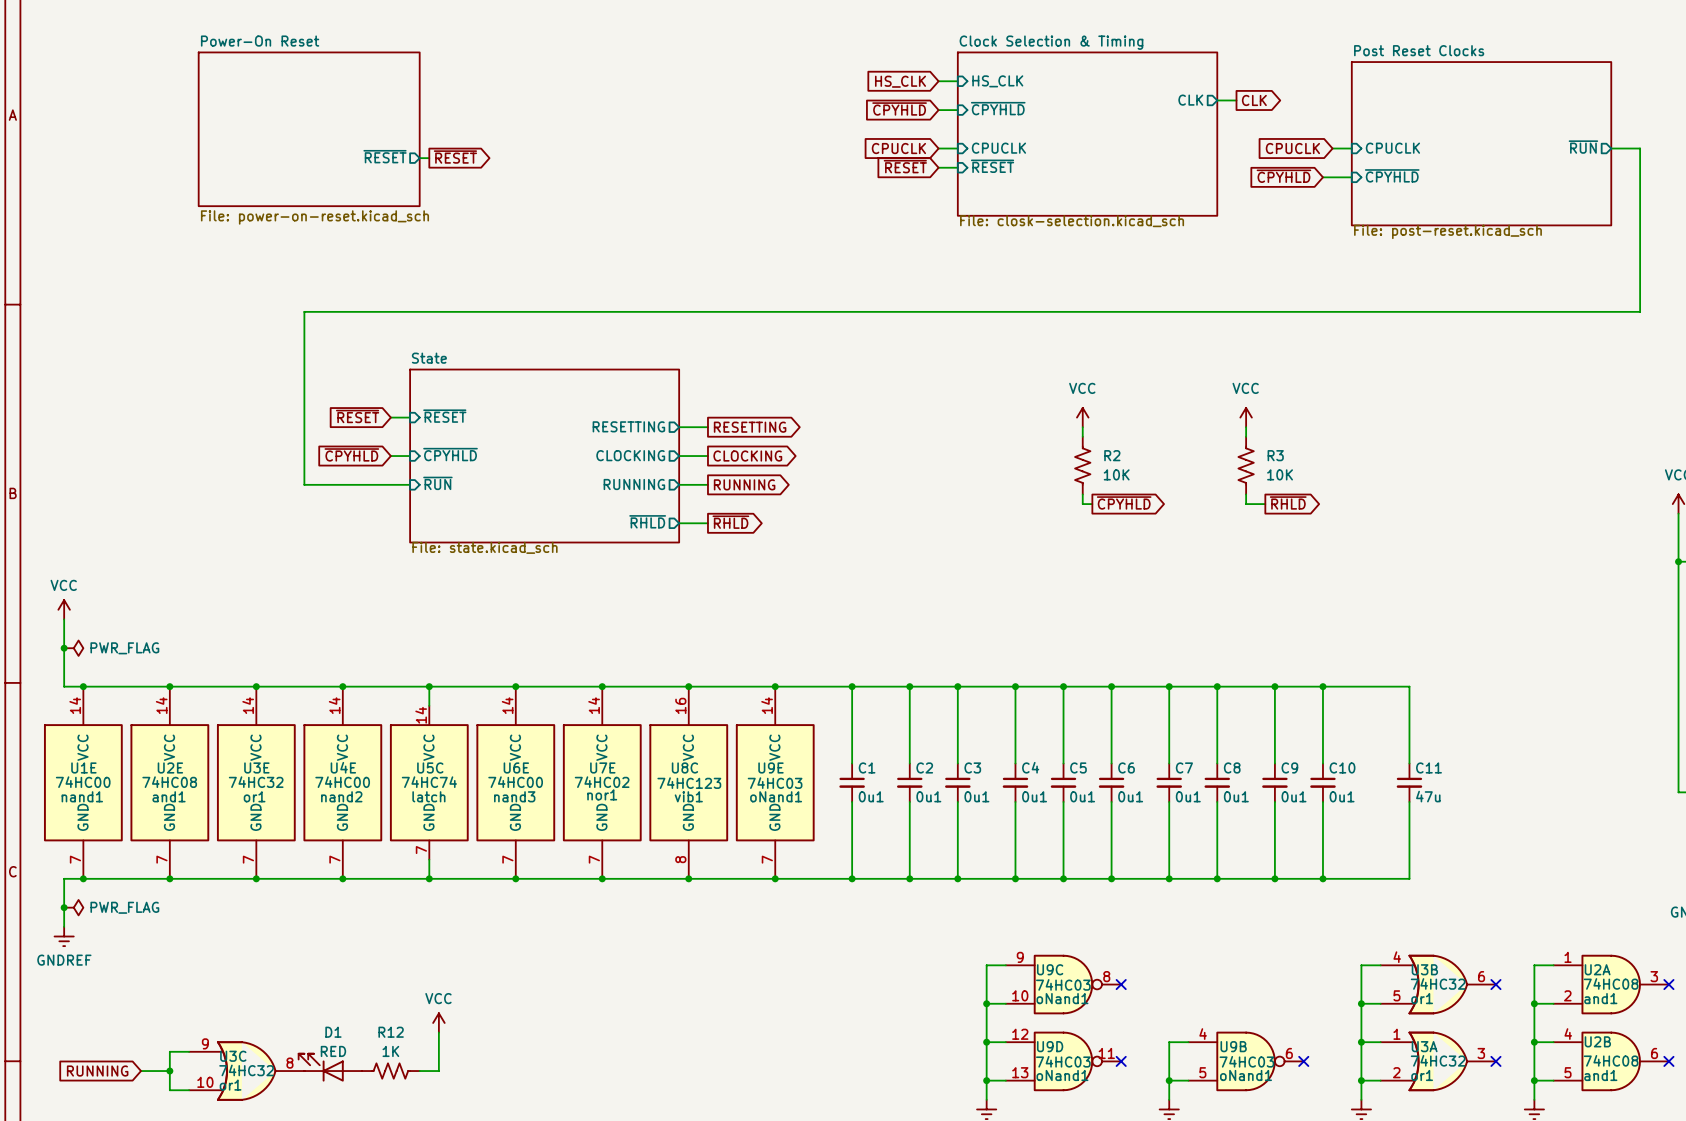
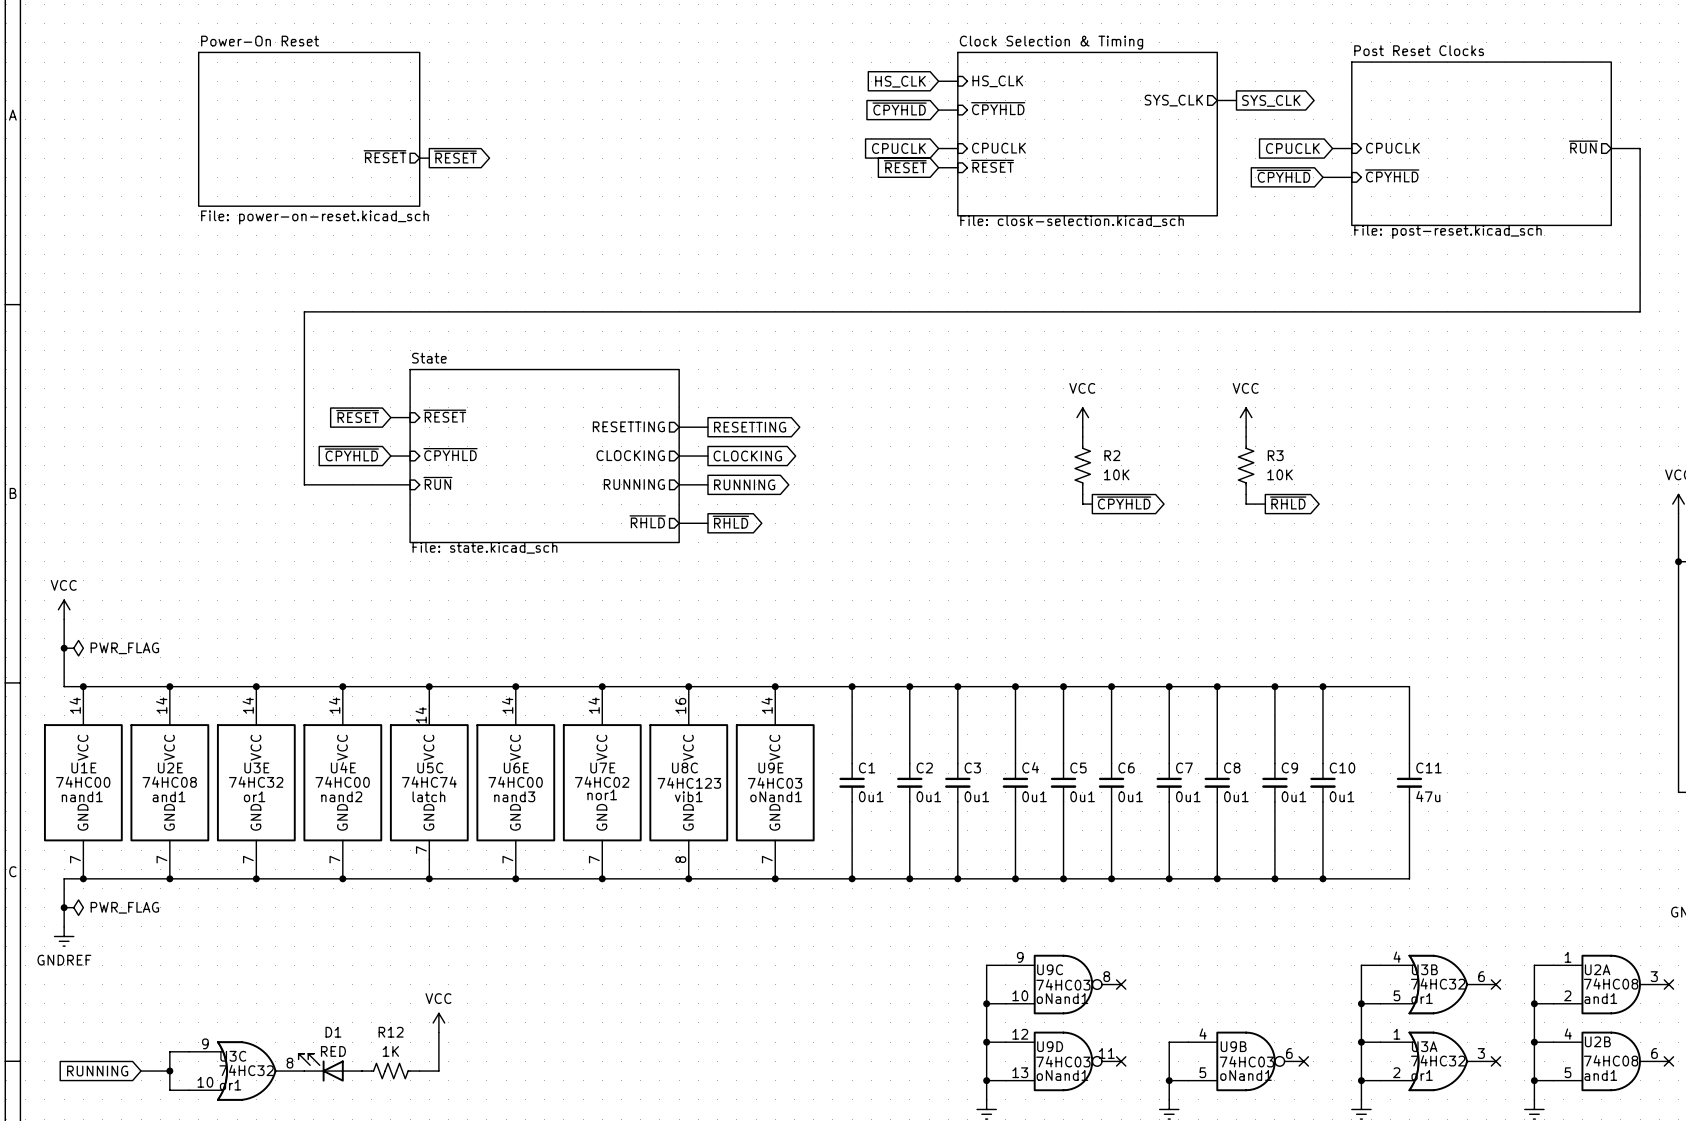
sheet pin: CLK (1190, 100) -> SYS_CLK (1173, 100)
global label: CLK (1254, 100) -> SYS_CLK (1271, 100)

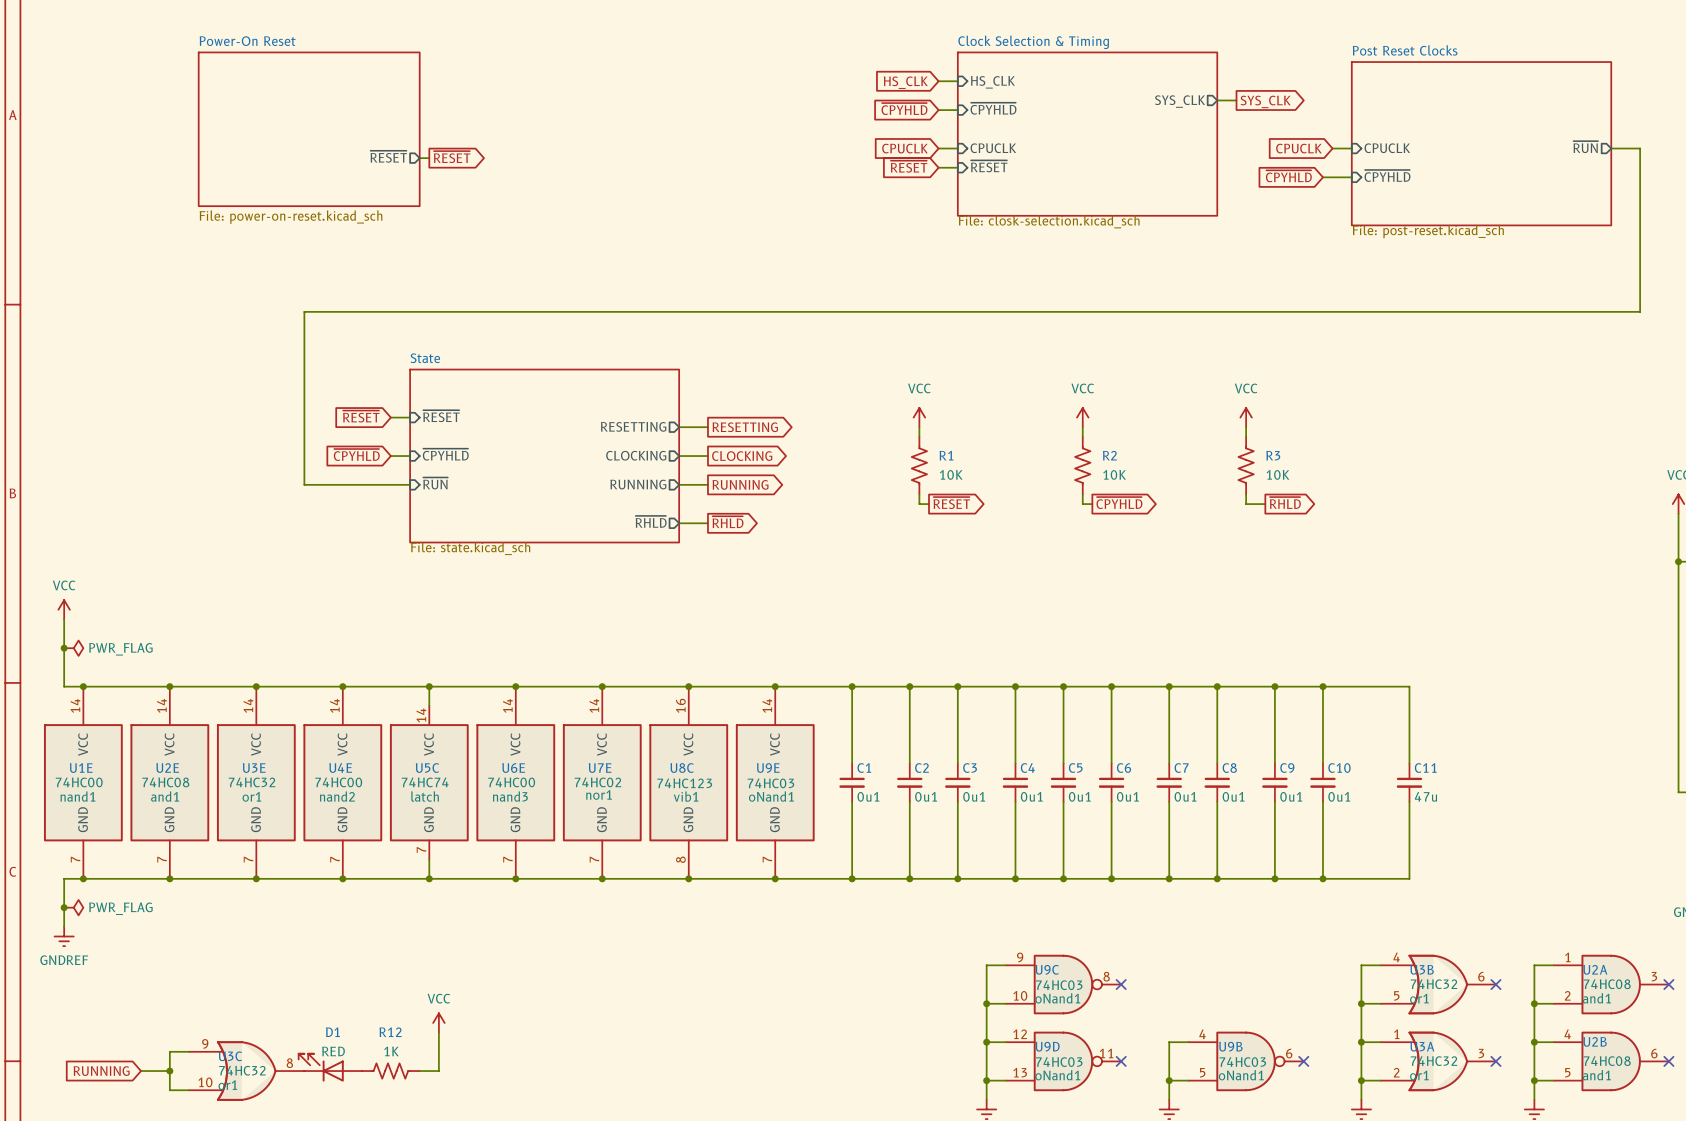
power symbol: none -> VCC (919, 417)
wire: none -> (919, 427) (919, 436)
R1: none -> 10K (919, 465)
wire: none -> (919, 494) (919, 504) (929, 504)
global label: none -> ~{RESET} (951, 503)

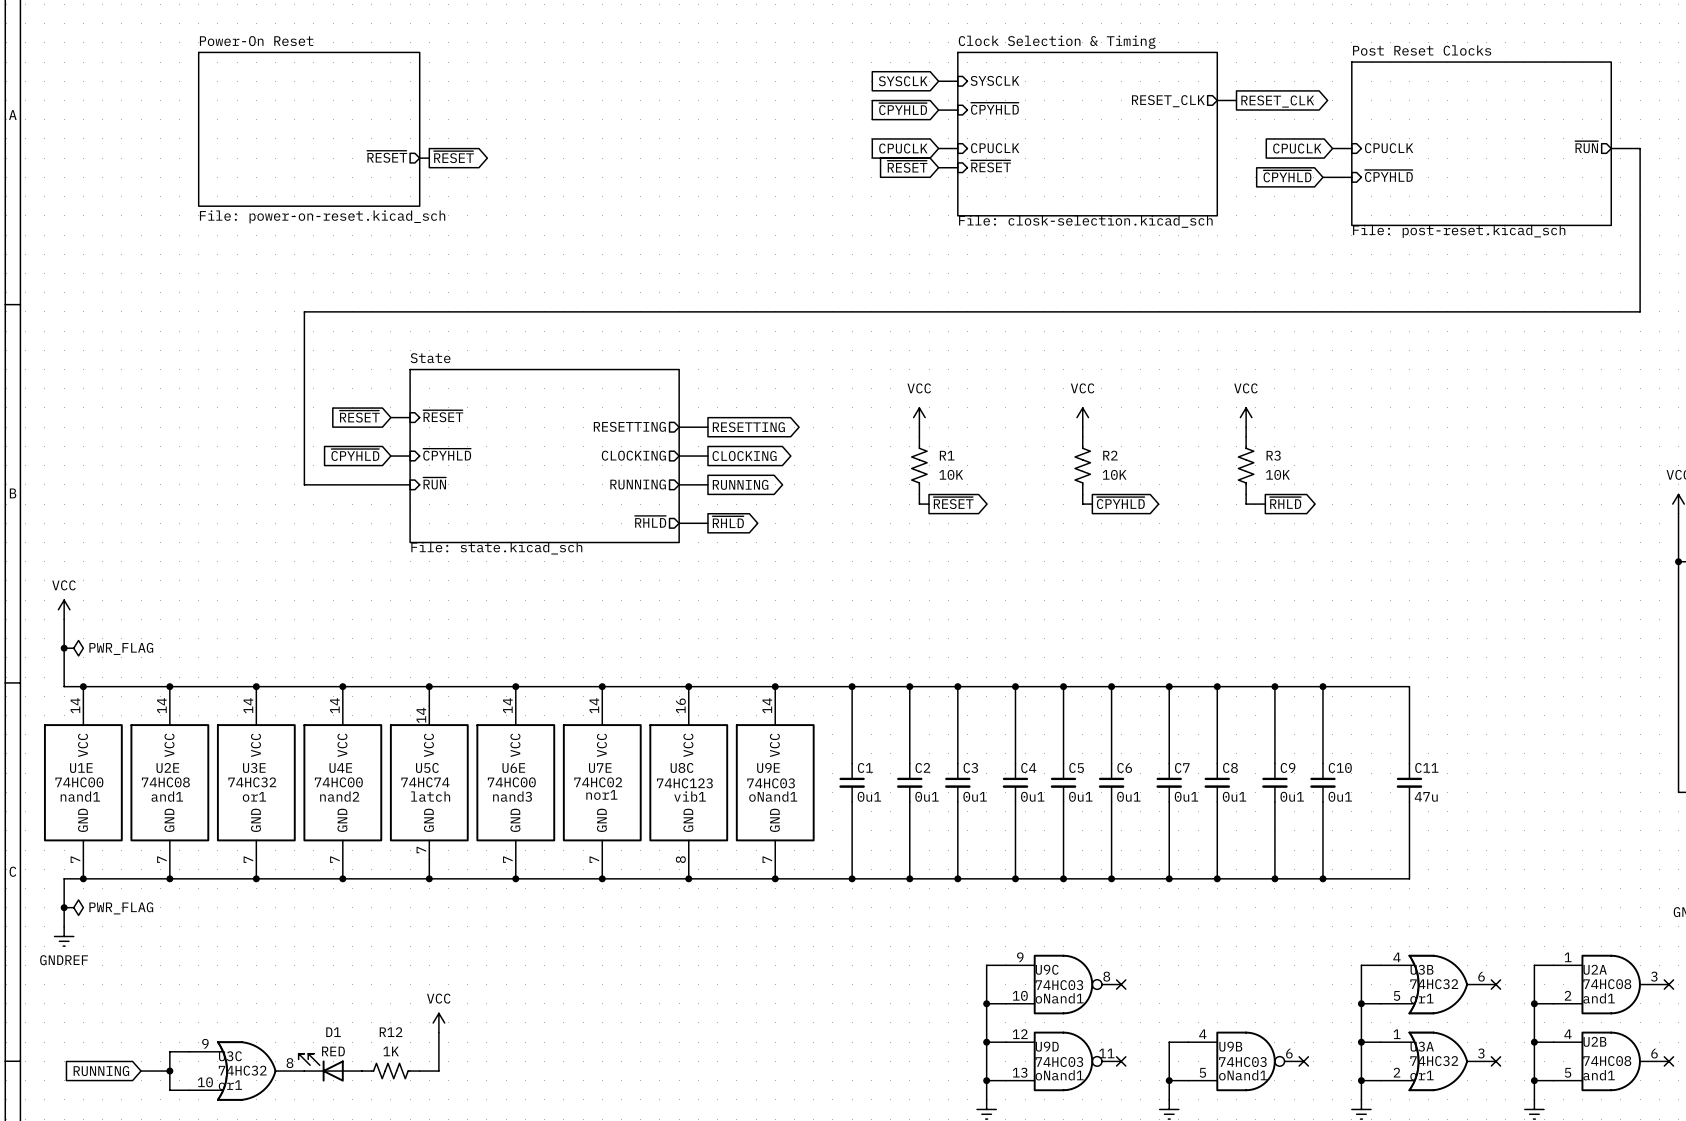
global label: HS_CLK (905, 82) -> SYSCLK (903, 81)
sheet pin: HS_CLK (992, 82) -> SYSCLK (994, 80)
sheet pin: SYS_CLK (1180, 101) -> RESET_CLK (1168, 101)
global label: SYS_CLK (1265, 101) -> RESET_CLK (1277, 101)

